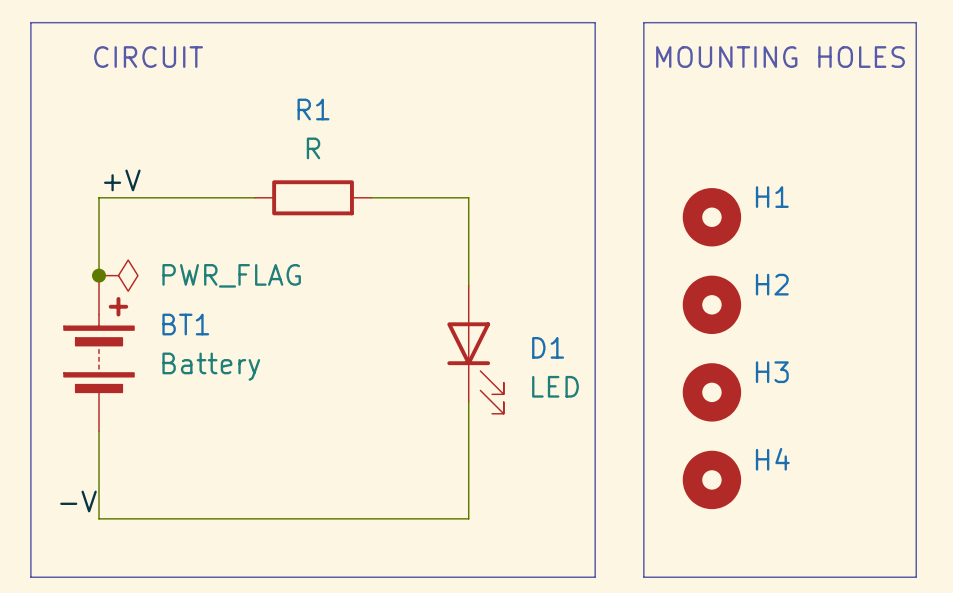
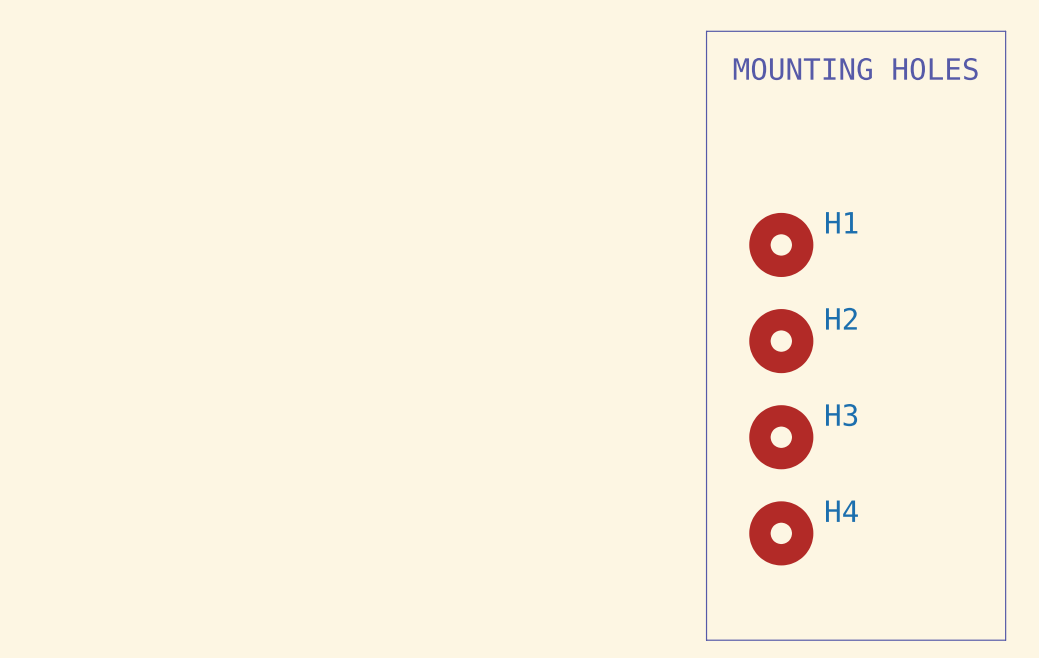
line: (30, 22) (595, 22) (595, 577) (30, 577) (30, 22) -> none
text: CIRCUIT (148, 57) -> none
label: +V (122, 180) -> none
wire: (254, 197) (99, 197) (99, 275) -> none
R1: R (313, 197) -> none
wire: (371, 197) (468, 197) (468, 285) -> none
junction: (99, 275) -> none
power symbol: PWR_FLAG (118, 275) -> none
D1: LED (475, 349) -> none
BT1: Battery (99, 353) -> none
wire: (468, 402) (468, 518) (99, 518) (99, 431) -> none
label: -V (78, 501) -> none

